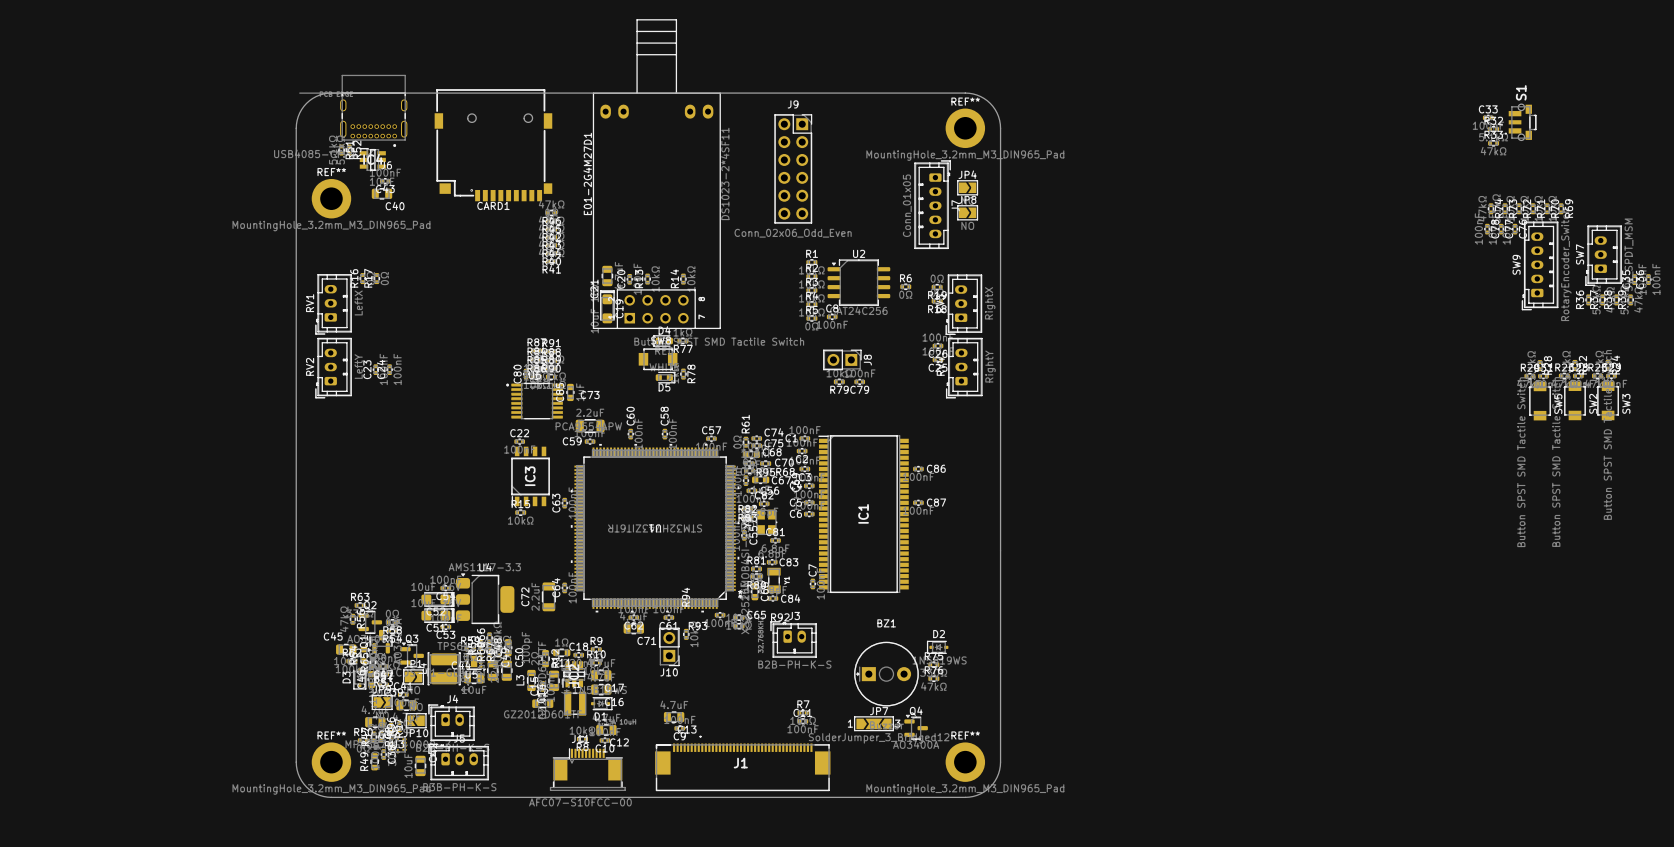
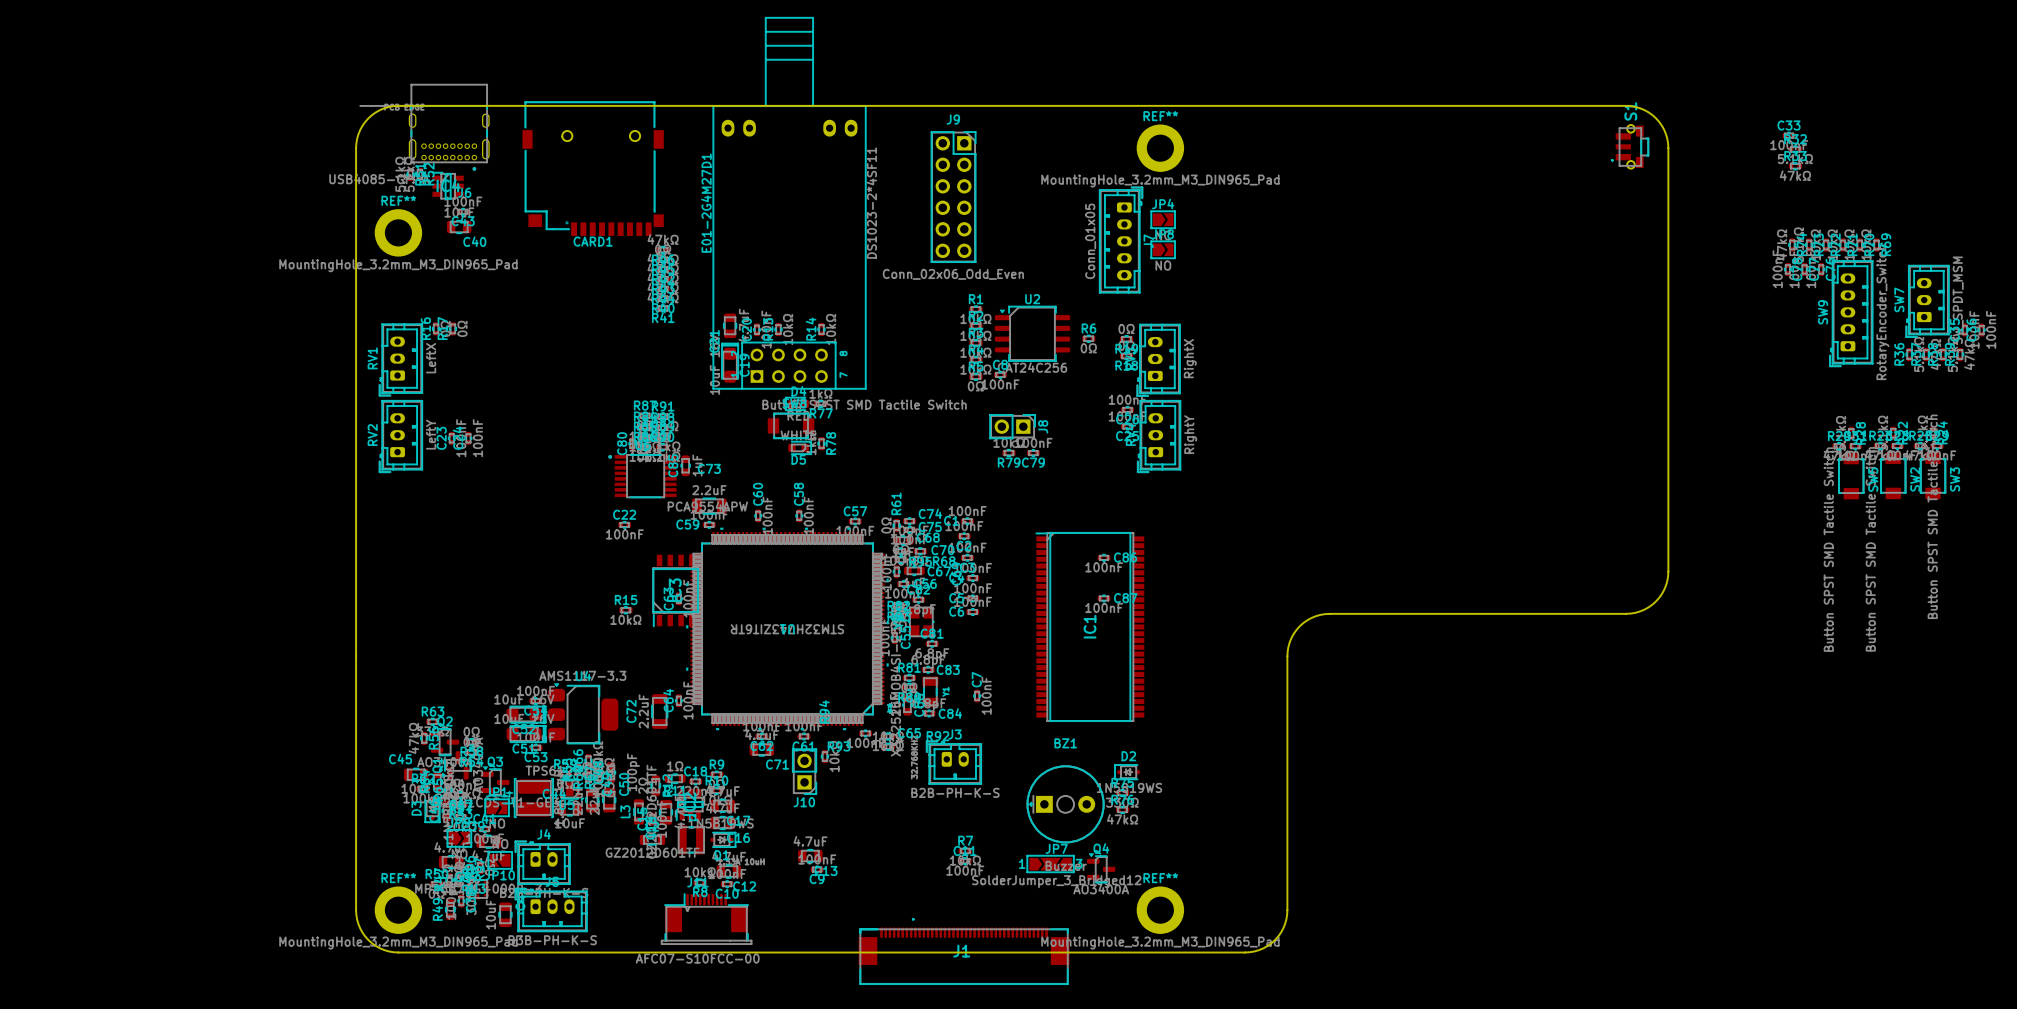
board edge: (965, 93) (980, 96) (990, 103) (998, 116) (1000, 128) (1000, 762) (998, 773) (990, 787) (980, 793) (965, 797) -> (1160, 105) (1630, 106) (1648, 112) (1659, 121) (1666, 134) (1668, 148) (1668, 571) (1667, 580) (1661, 594) (1648, 607) (1630, 613) (1329, 613) (1315, 616) (1303, 623) (1291, 637) (1287, 651) (1287, 910) (1283, 928) (1271, 943) (1254, 951) (1160, 952)
S1 position: (1520, 122) -> (1630, 146)
IC3 position: (530, 476) -> (675, 590)
IC1 position: (863, 514) -> (1089, 626)
J1 position: (742, 763) -> (964, 951)

